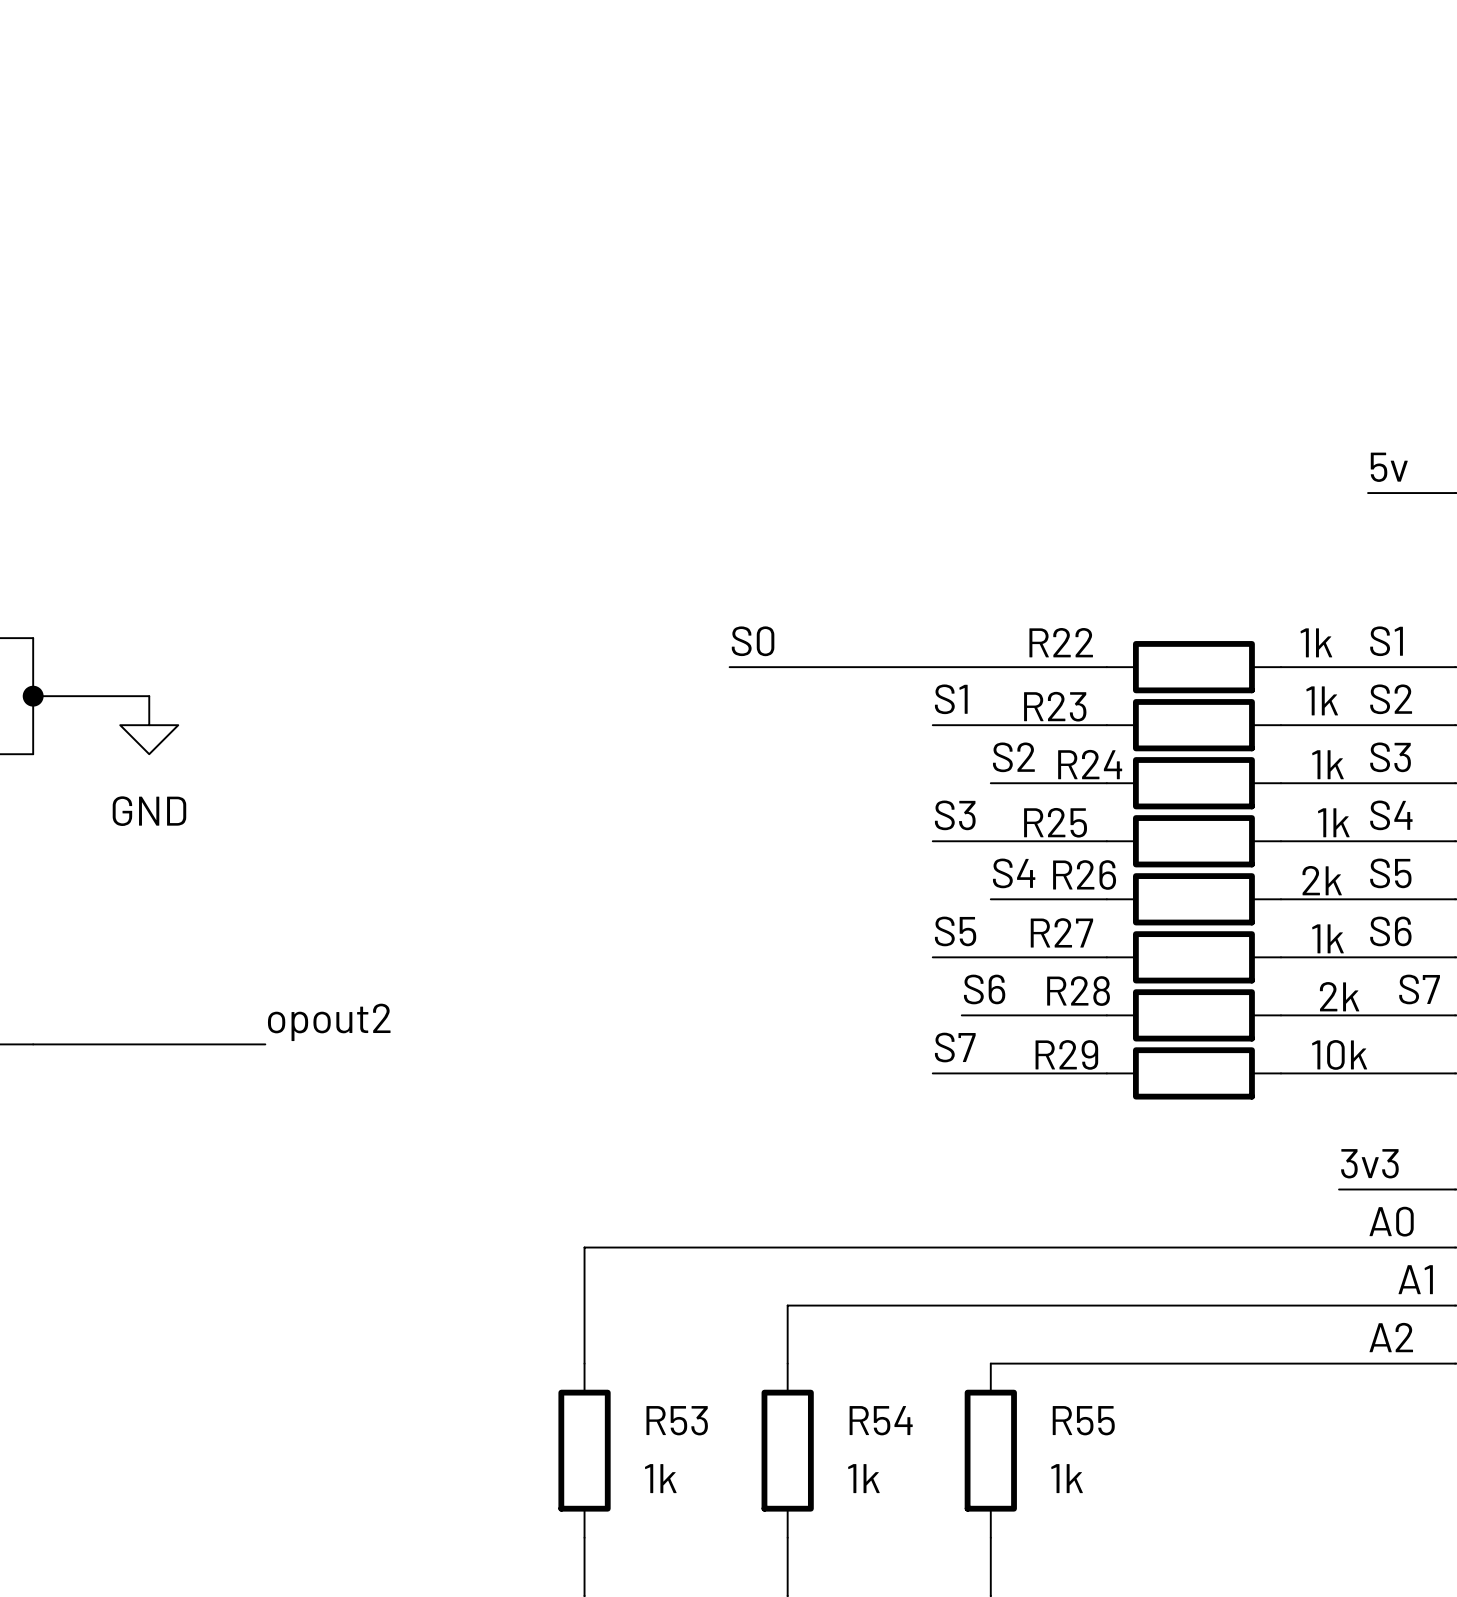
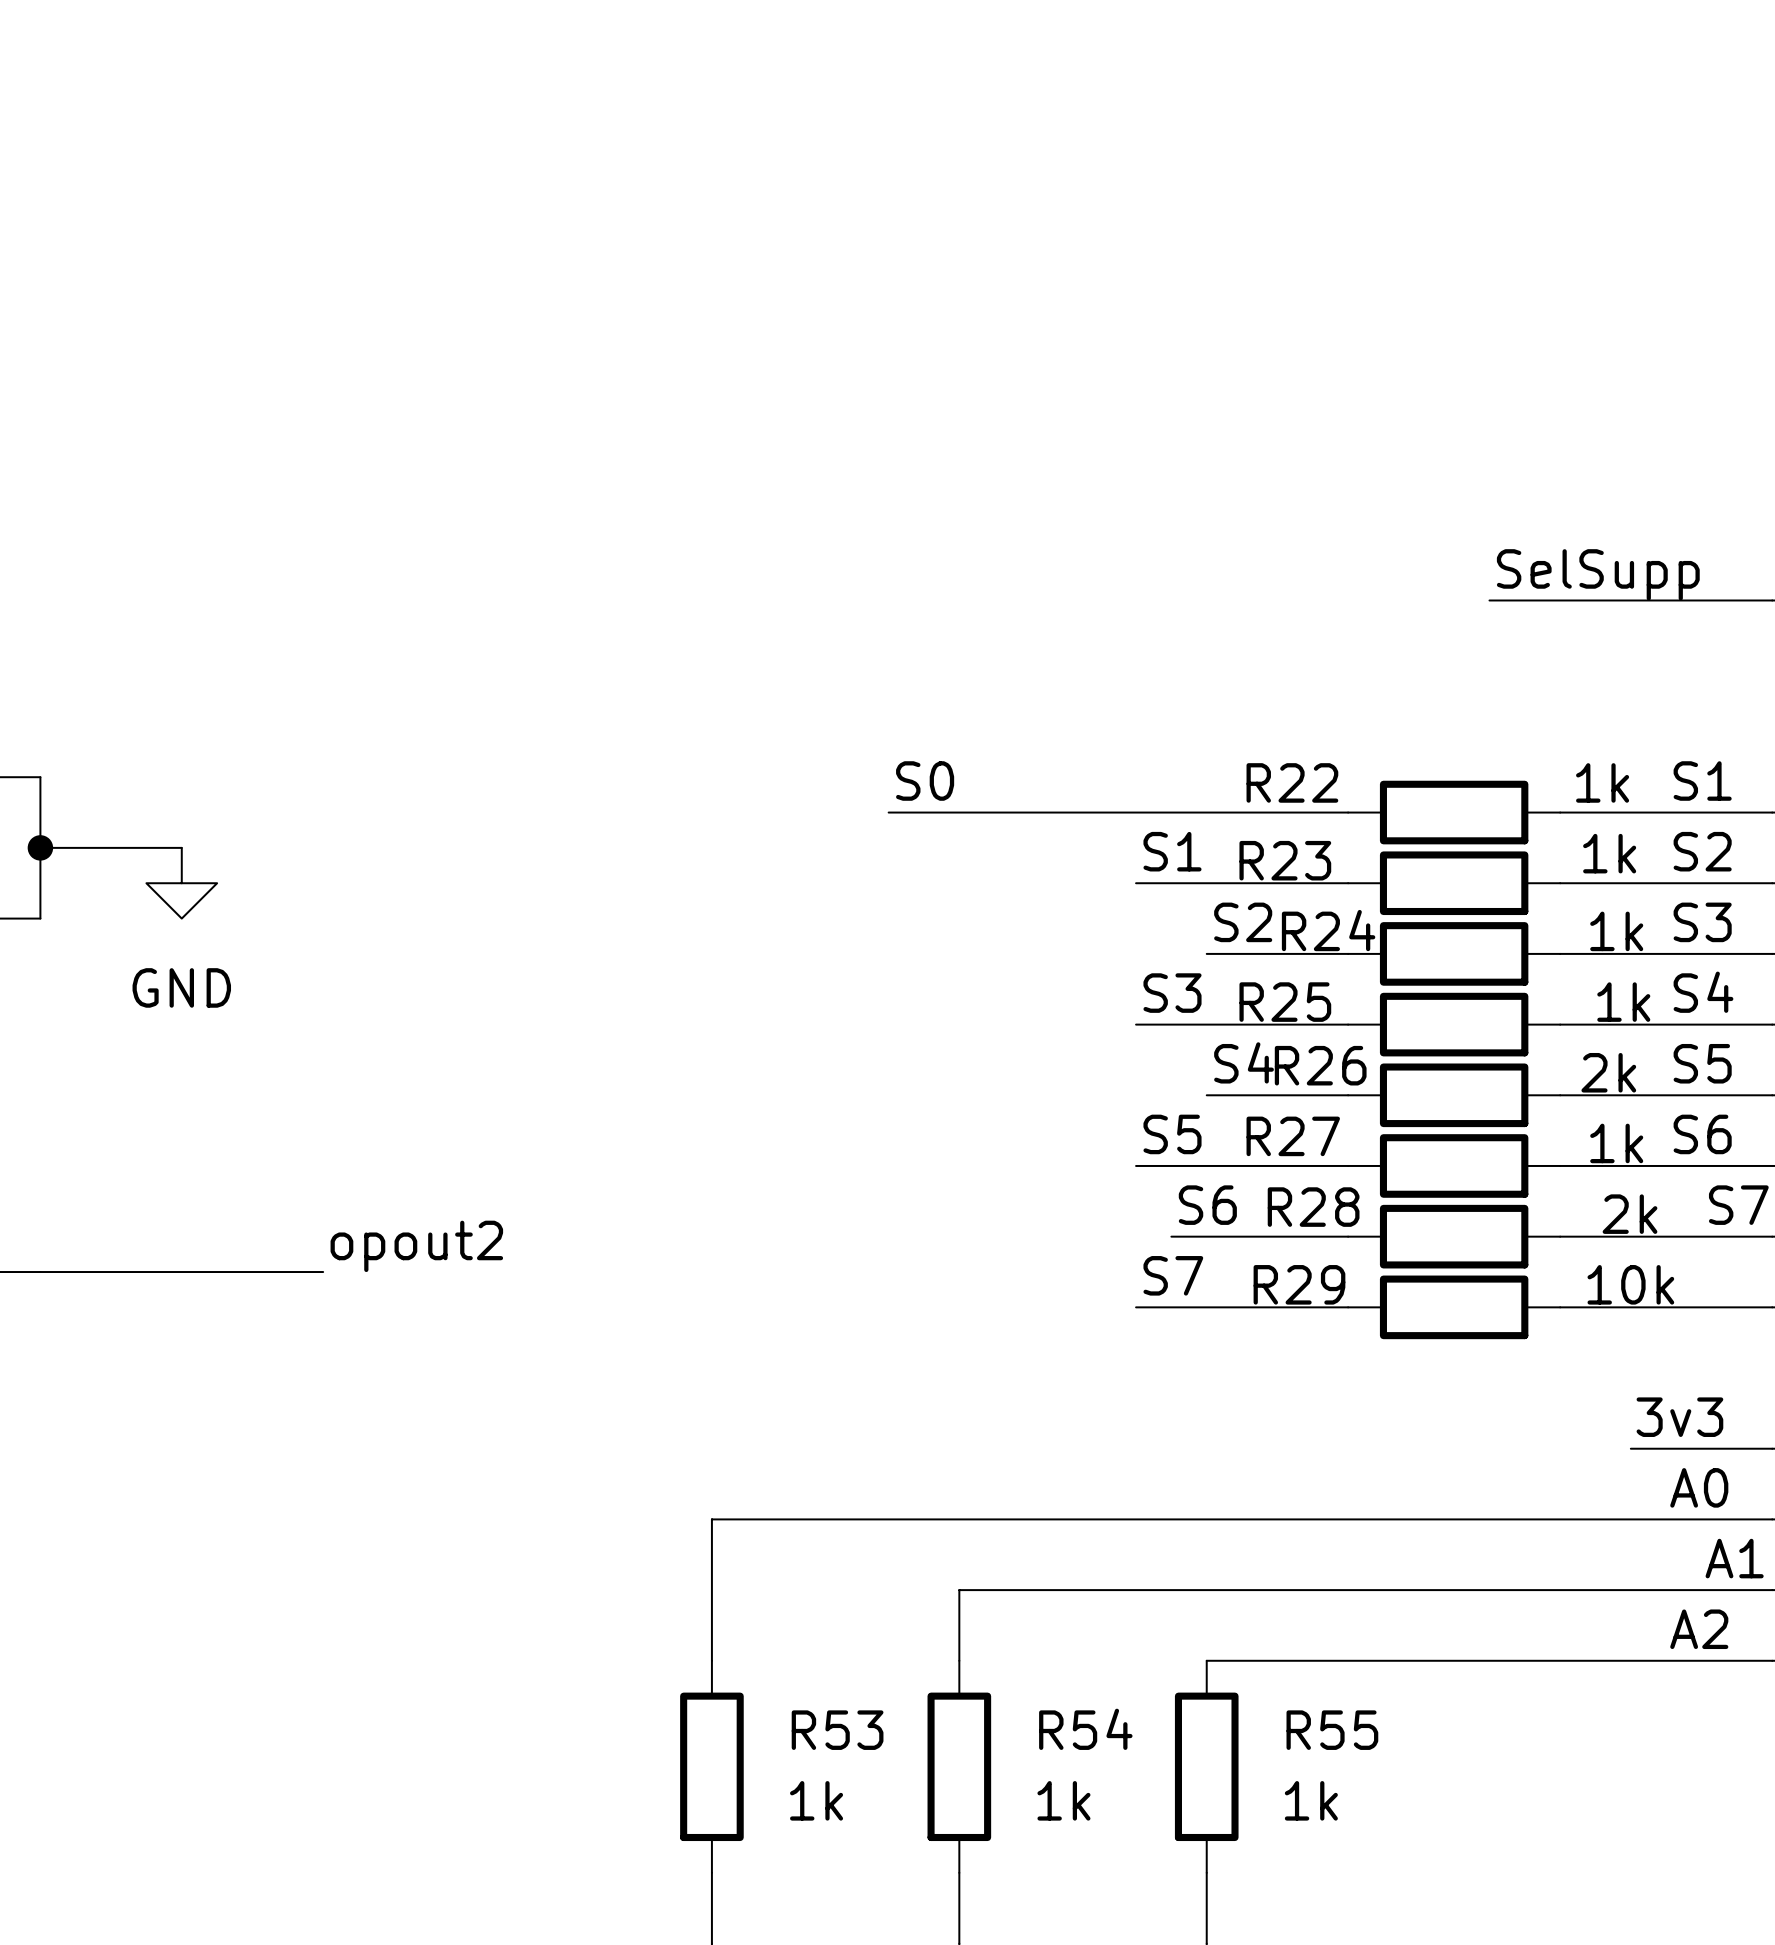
label: 5v (1389, 467) -> none
label: none -> SelSupp (1598, 574)
wire: none -> (1489, 600) (1666, 600)

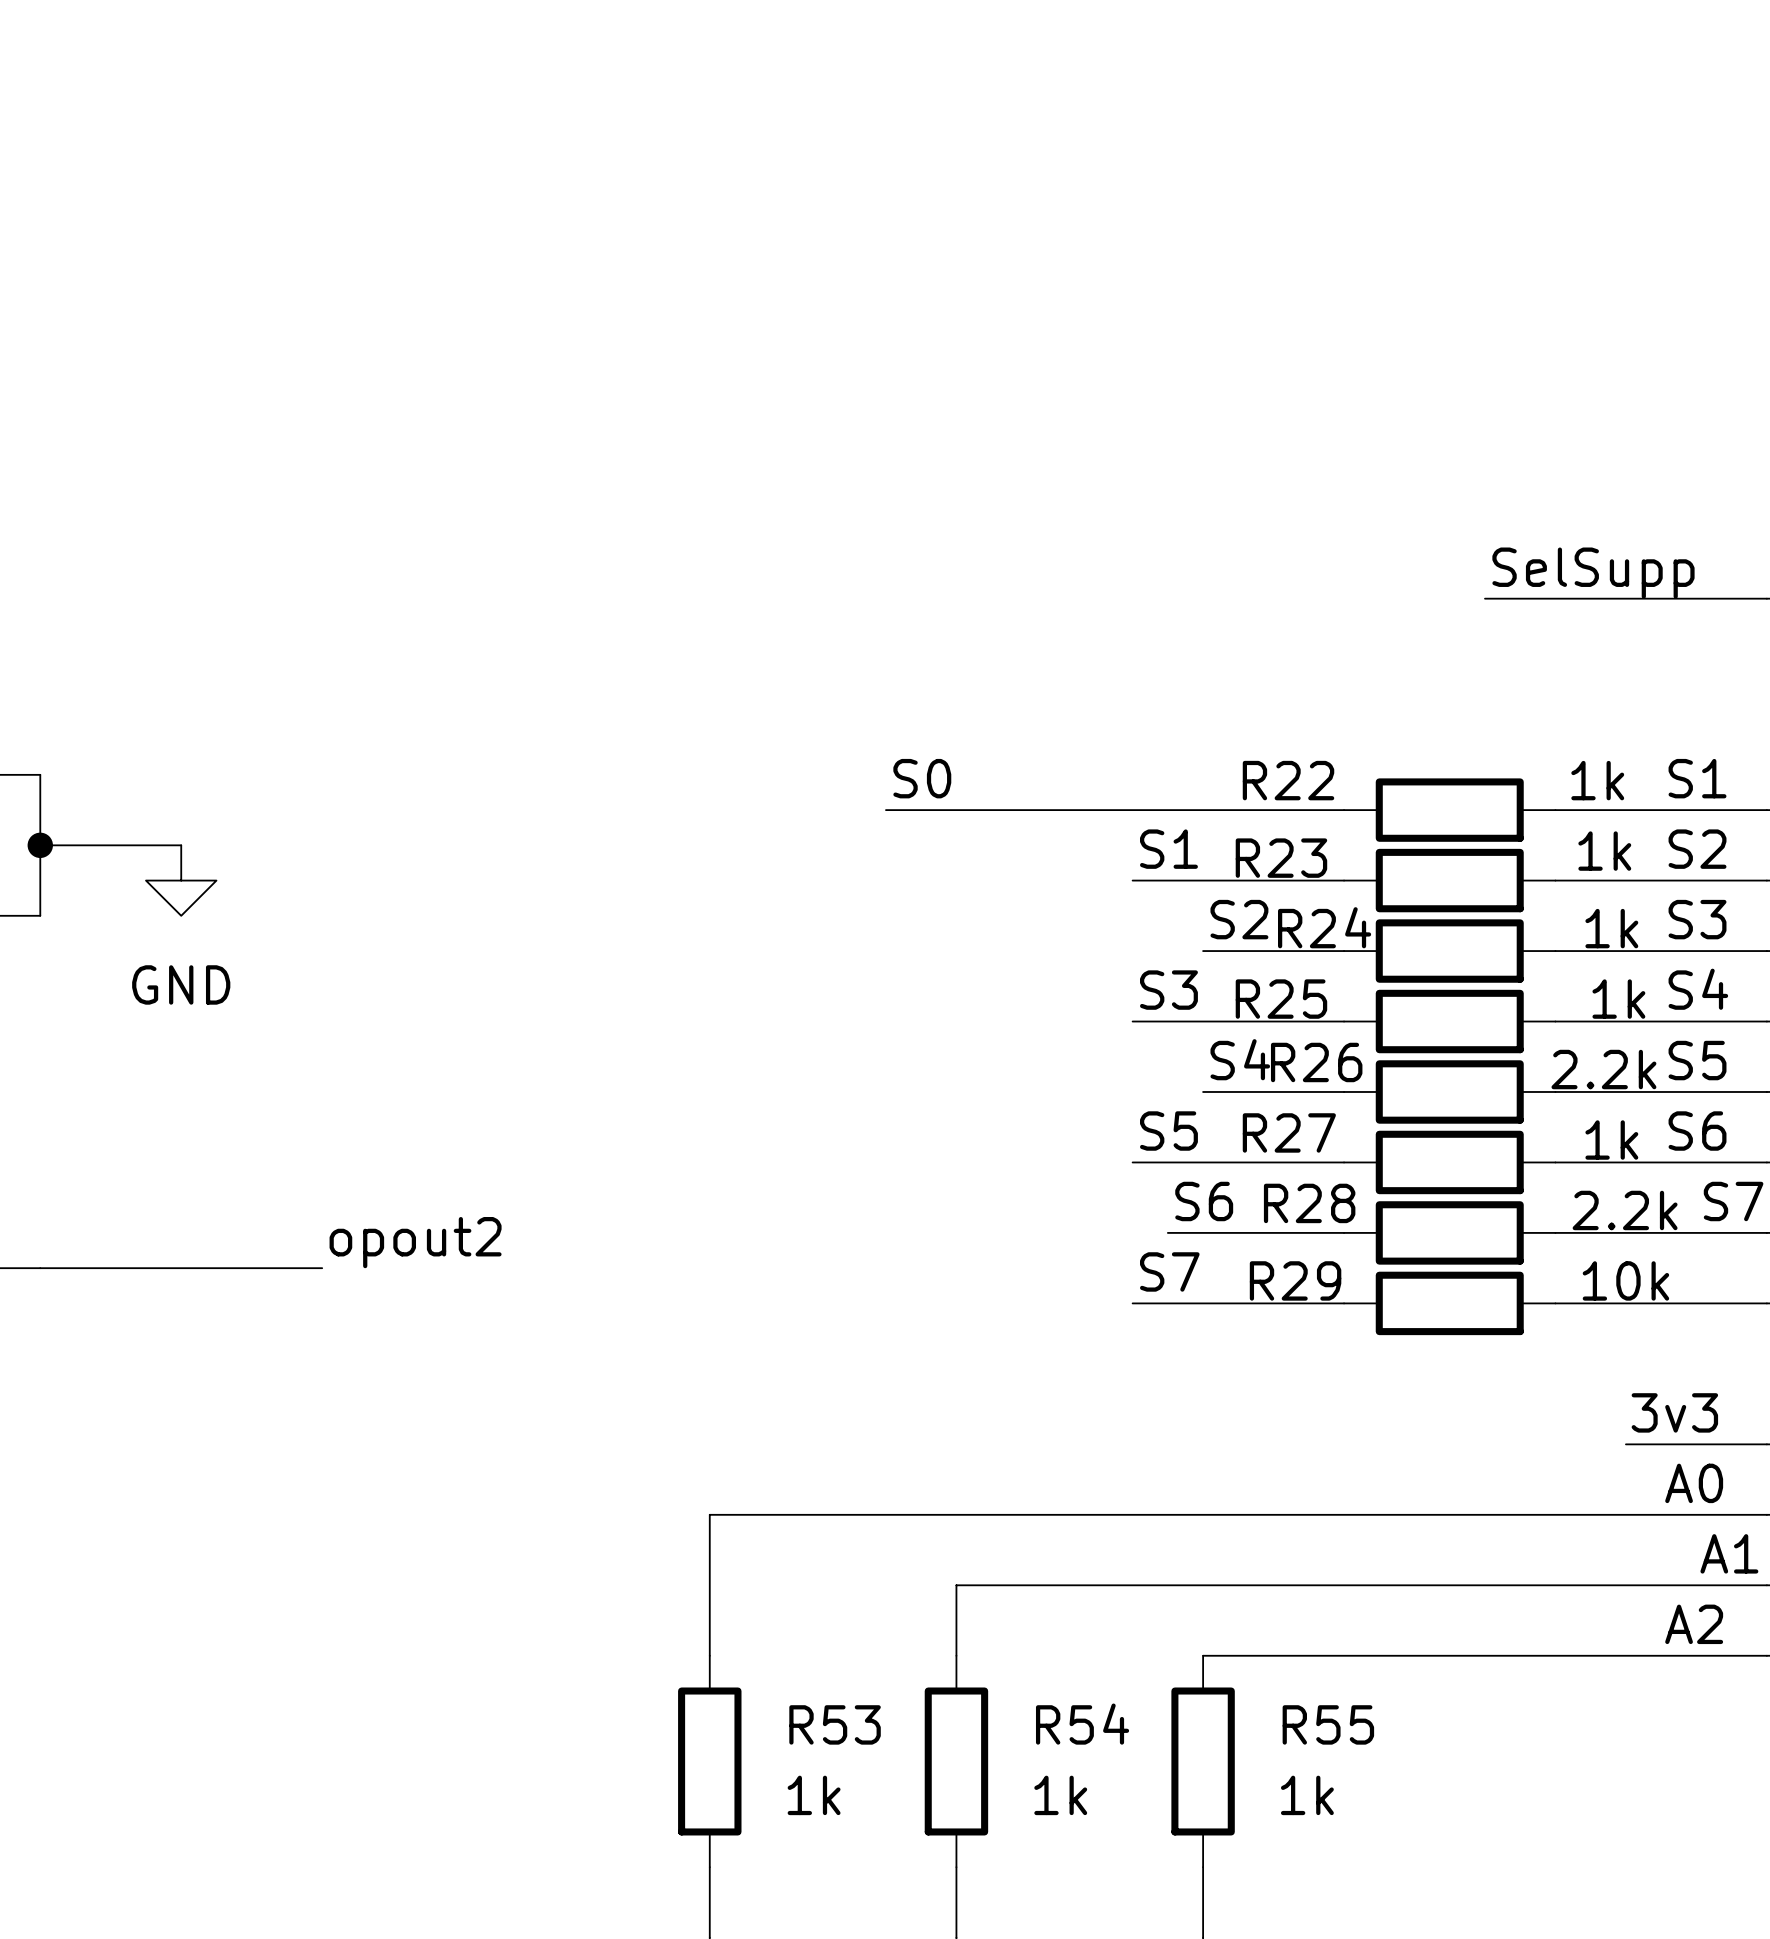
R26 value: 2k (1608, 1072) -> 2.2k (1603, 1069)
R28 value: 2k (1630, 1214) -> 2.2k (1625, 1210)

